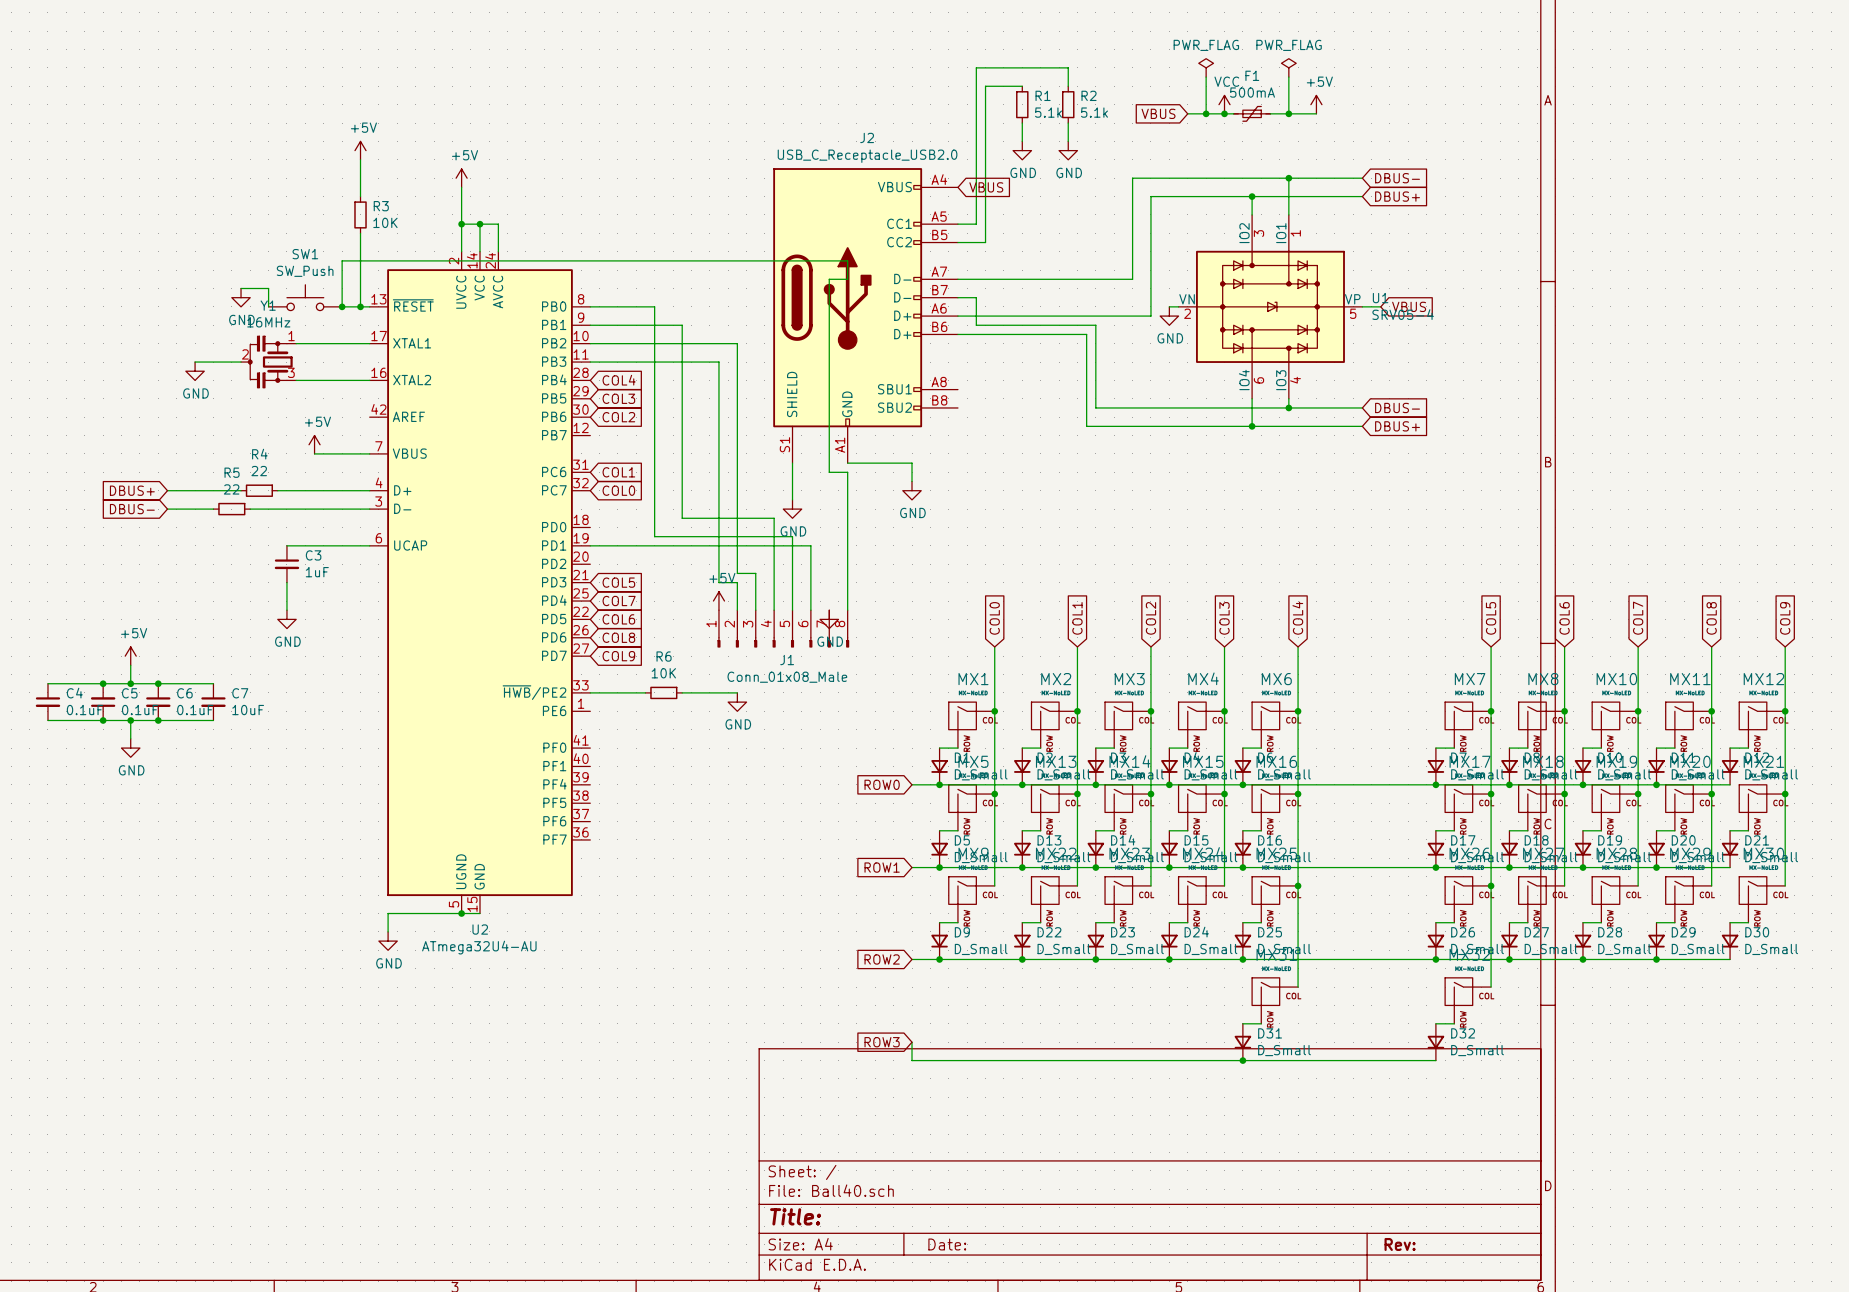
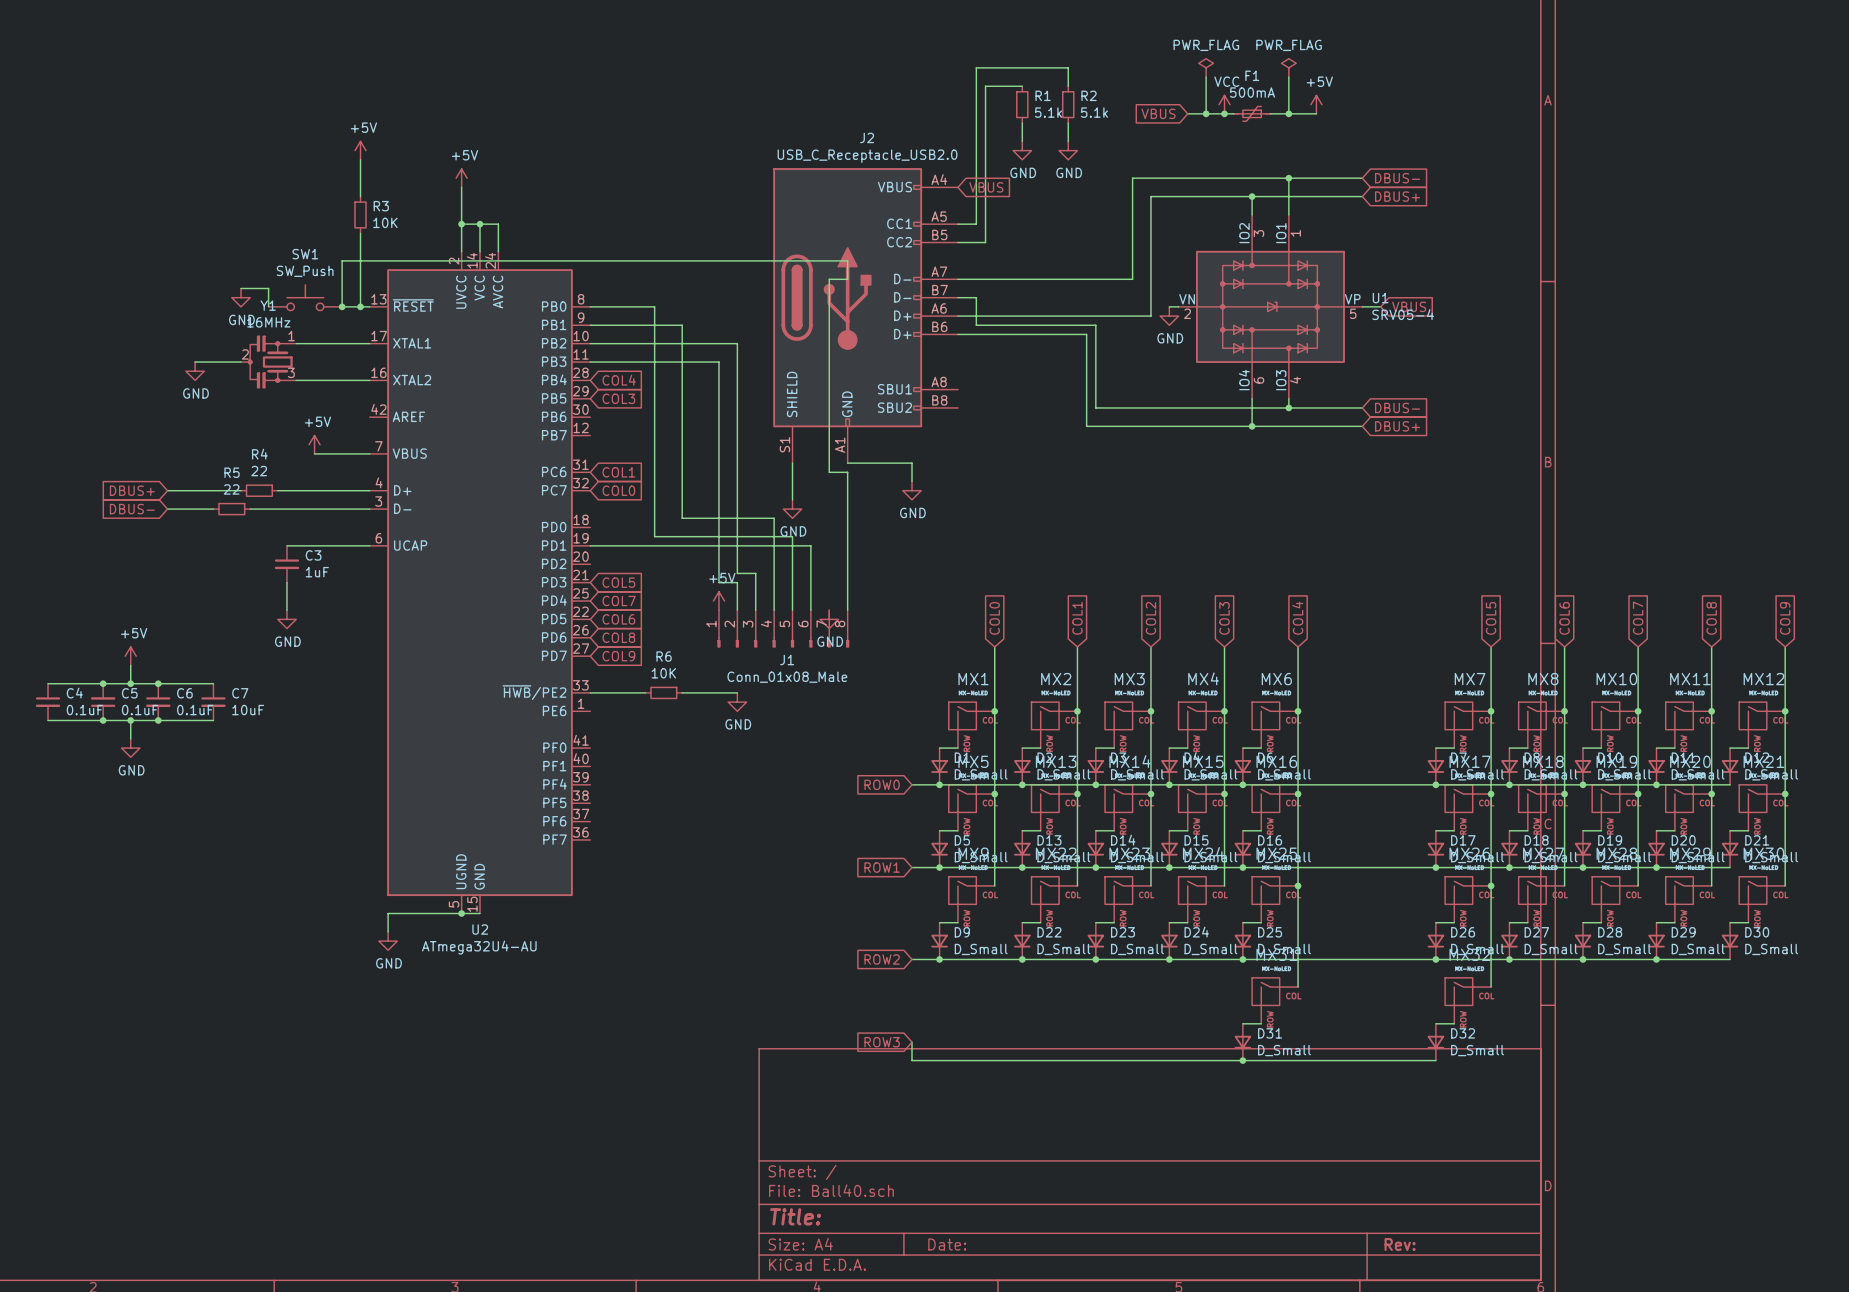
global label: COL2 (618, 417) -> none

